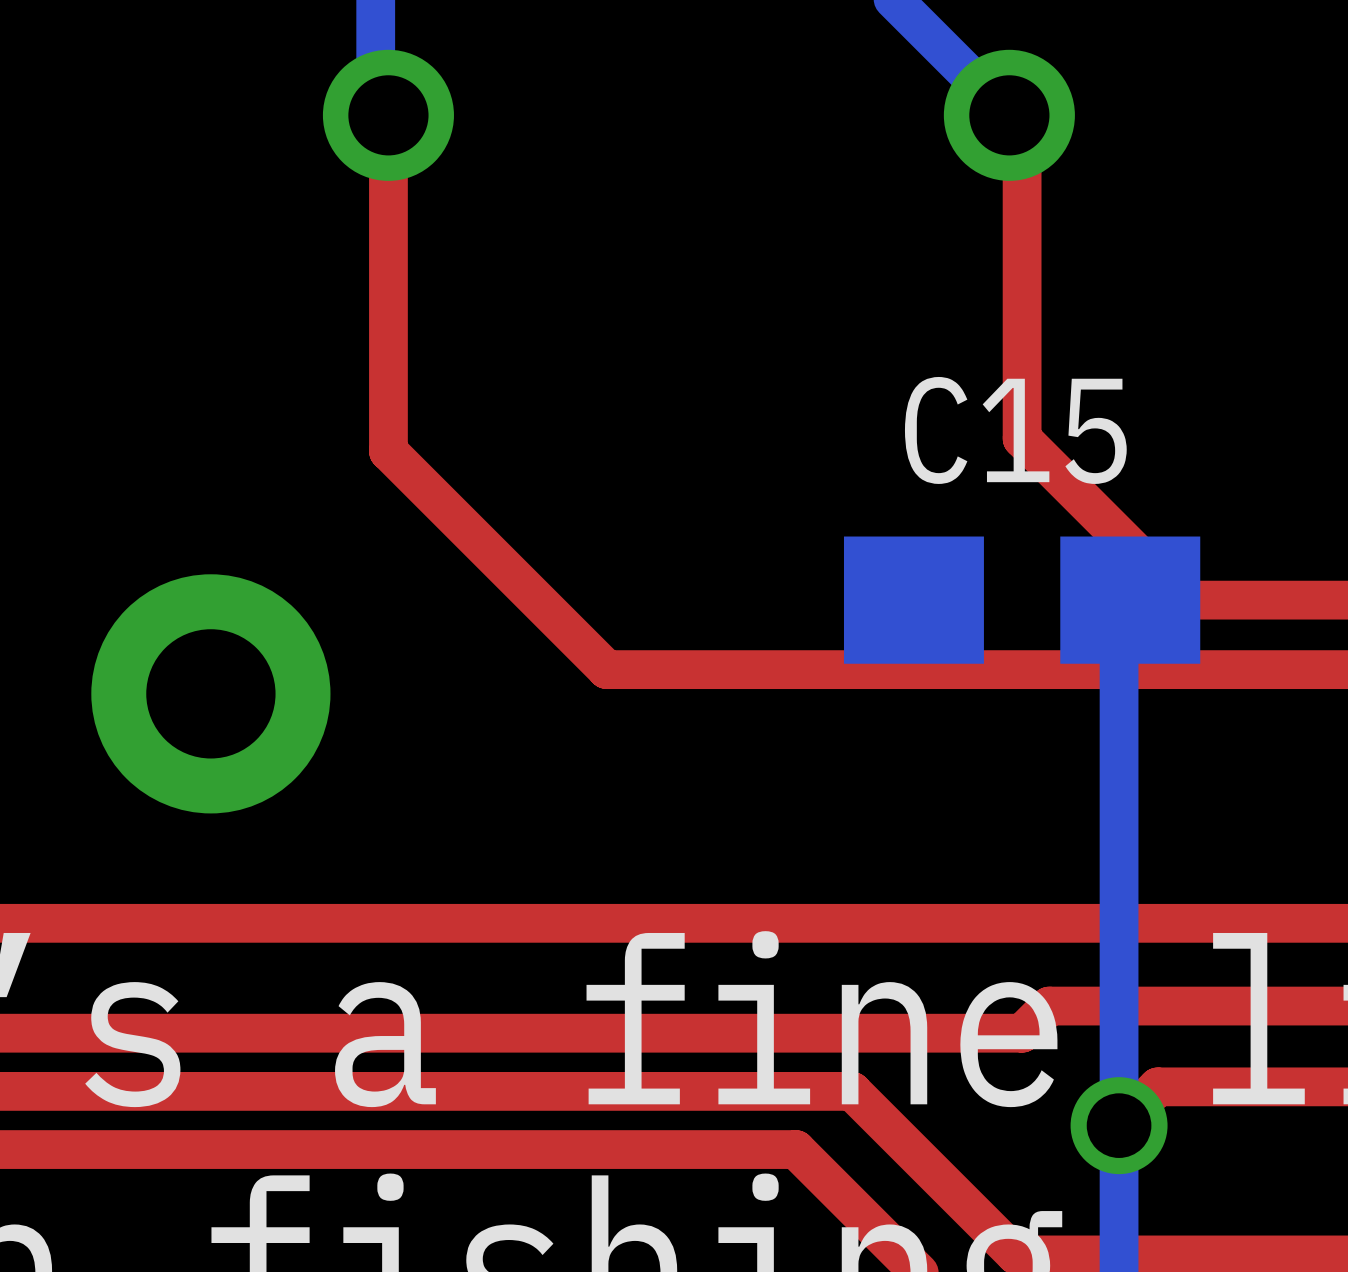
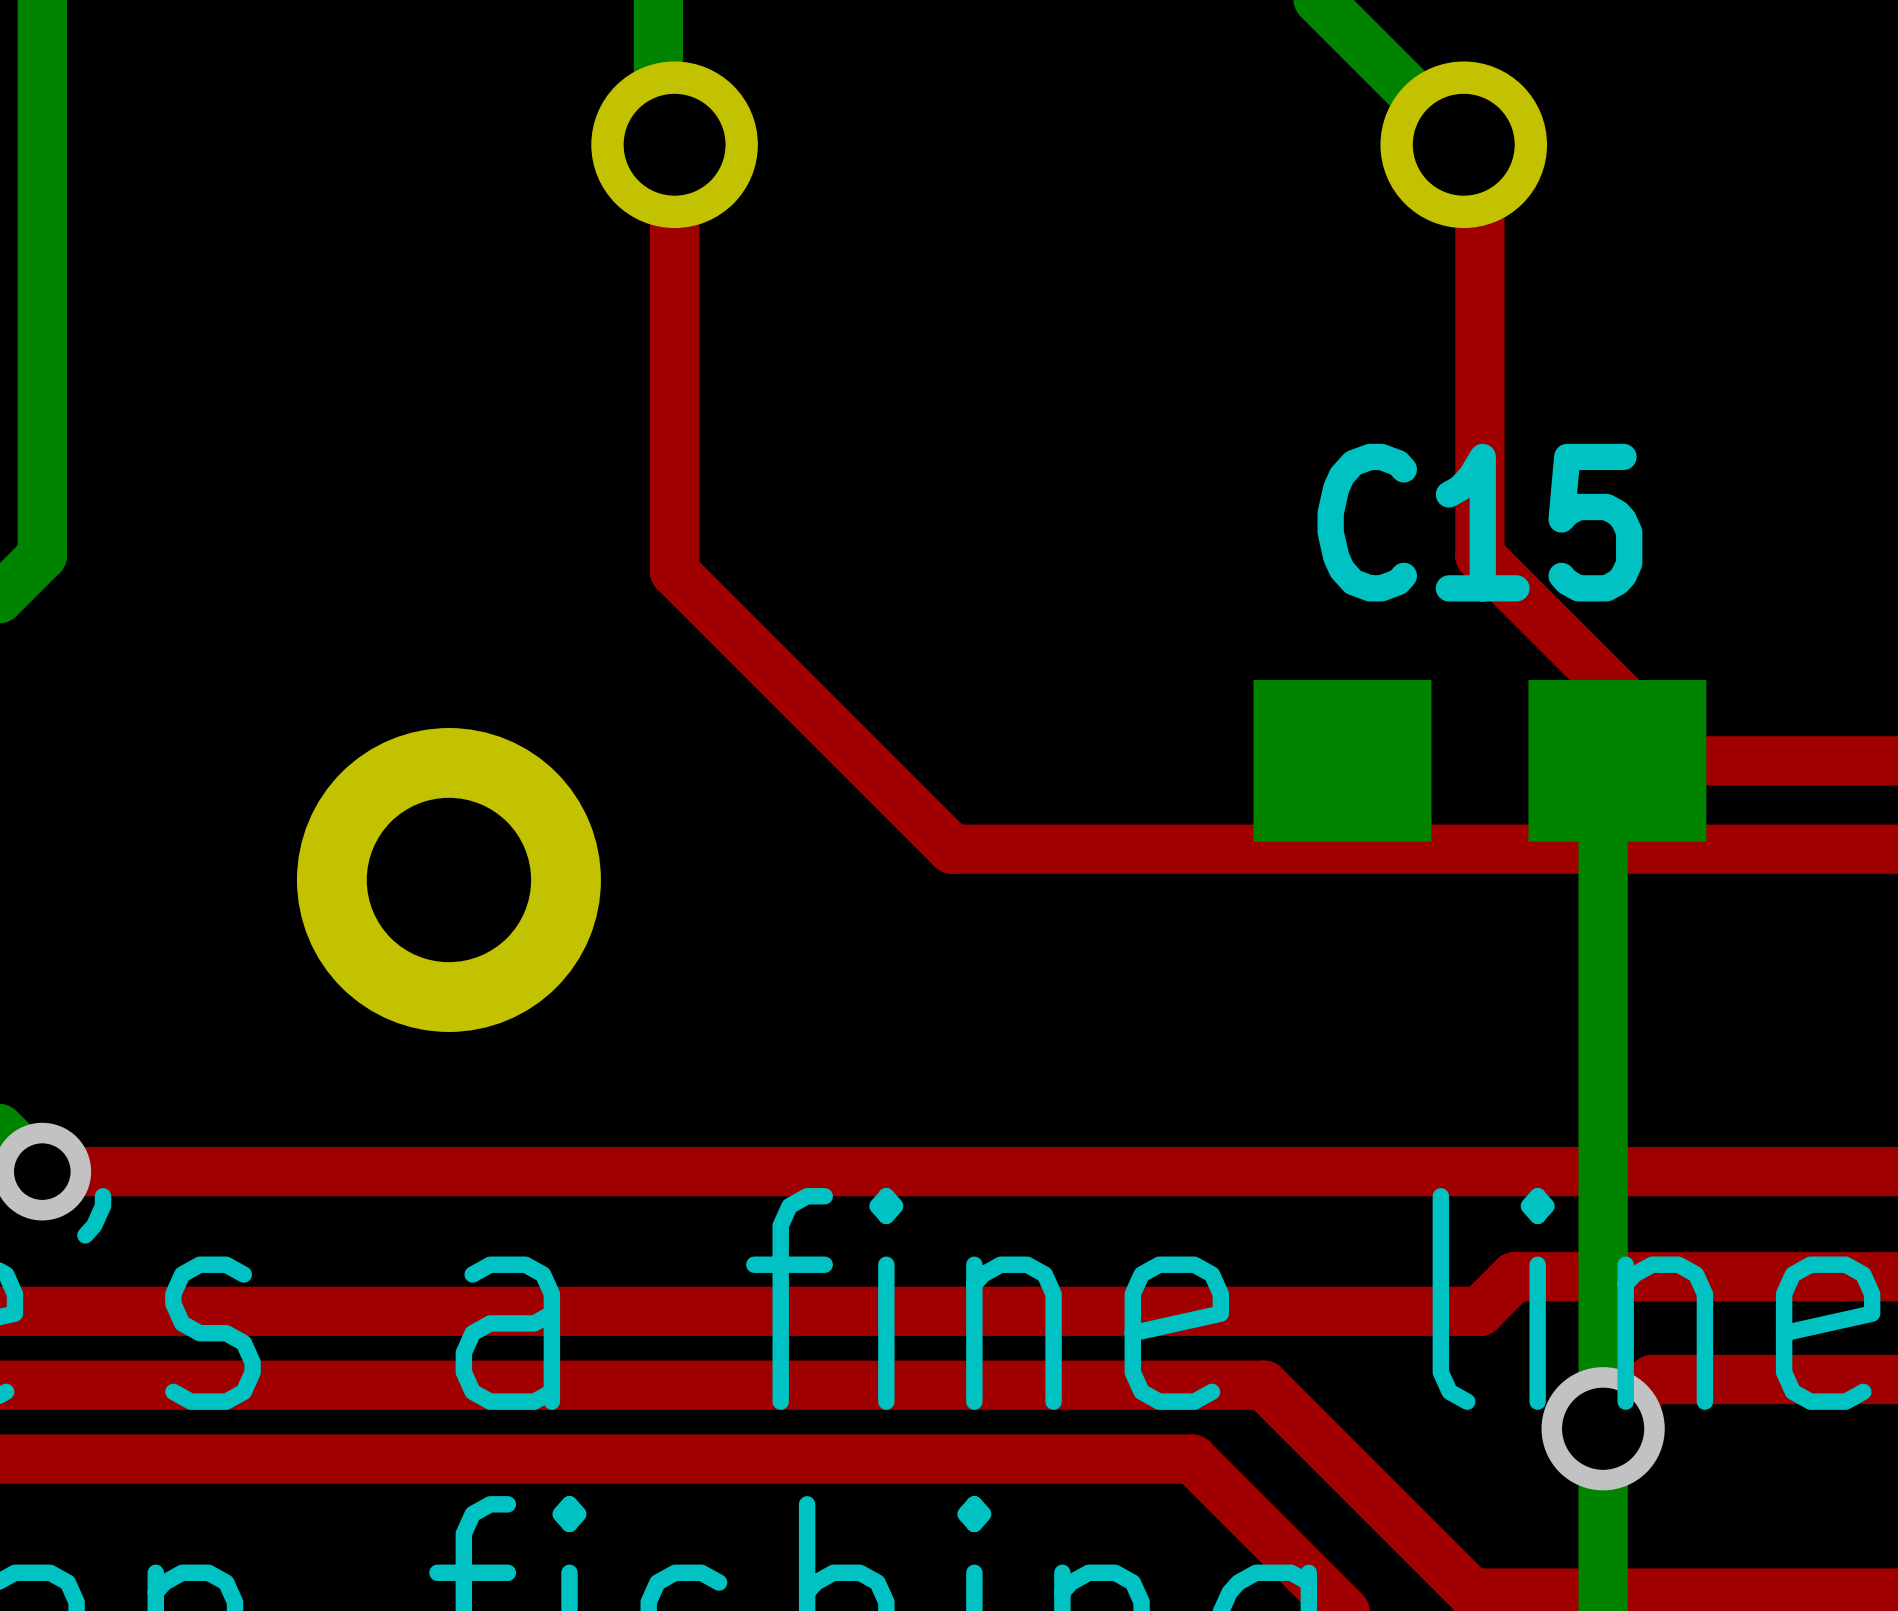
C15 name position: C15 (1015, 430) -> C15 (1479, 522)

